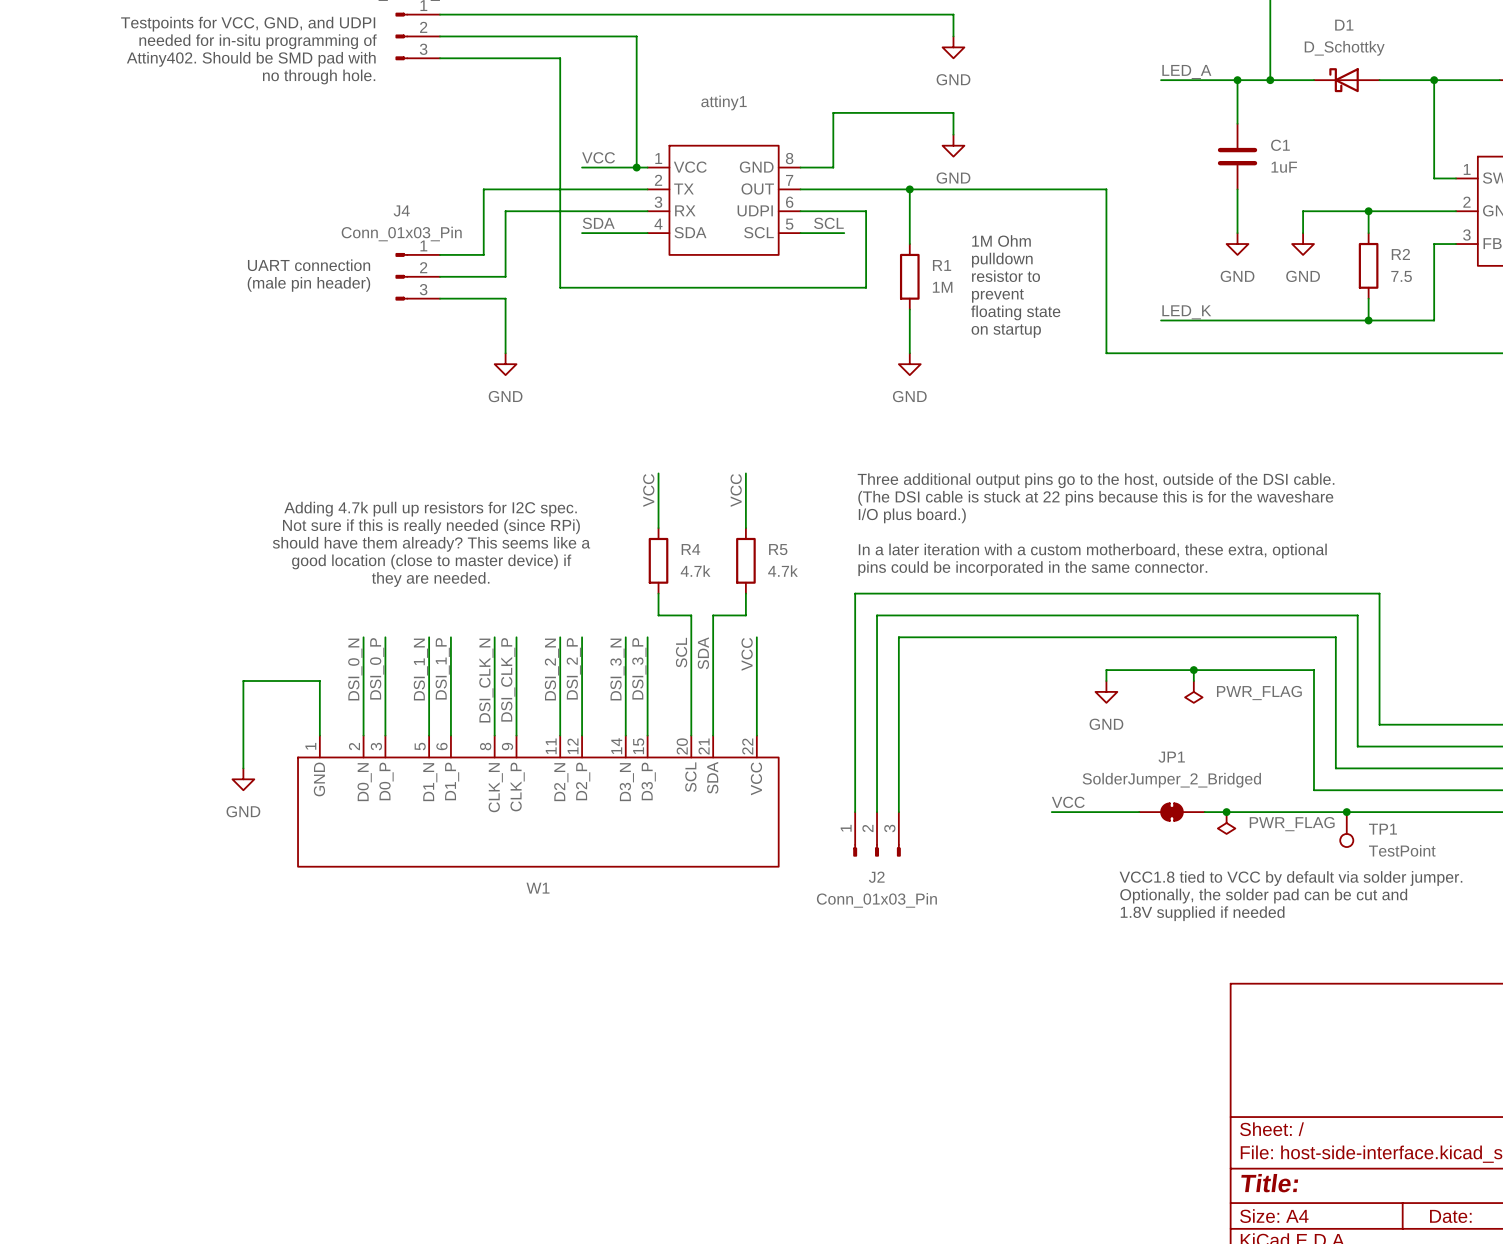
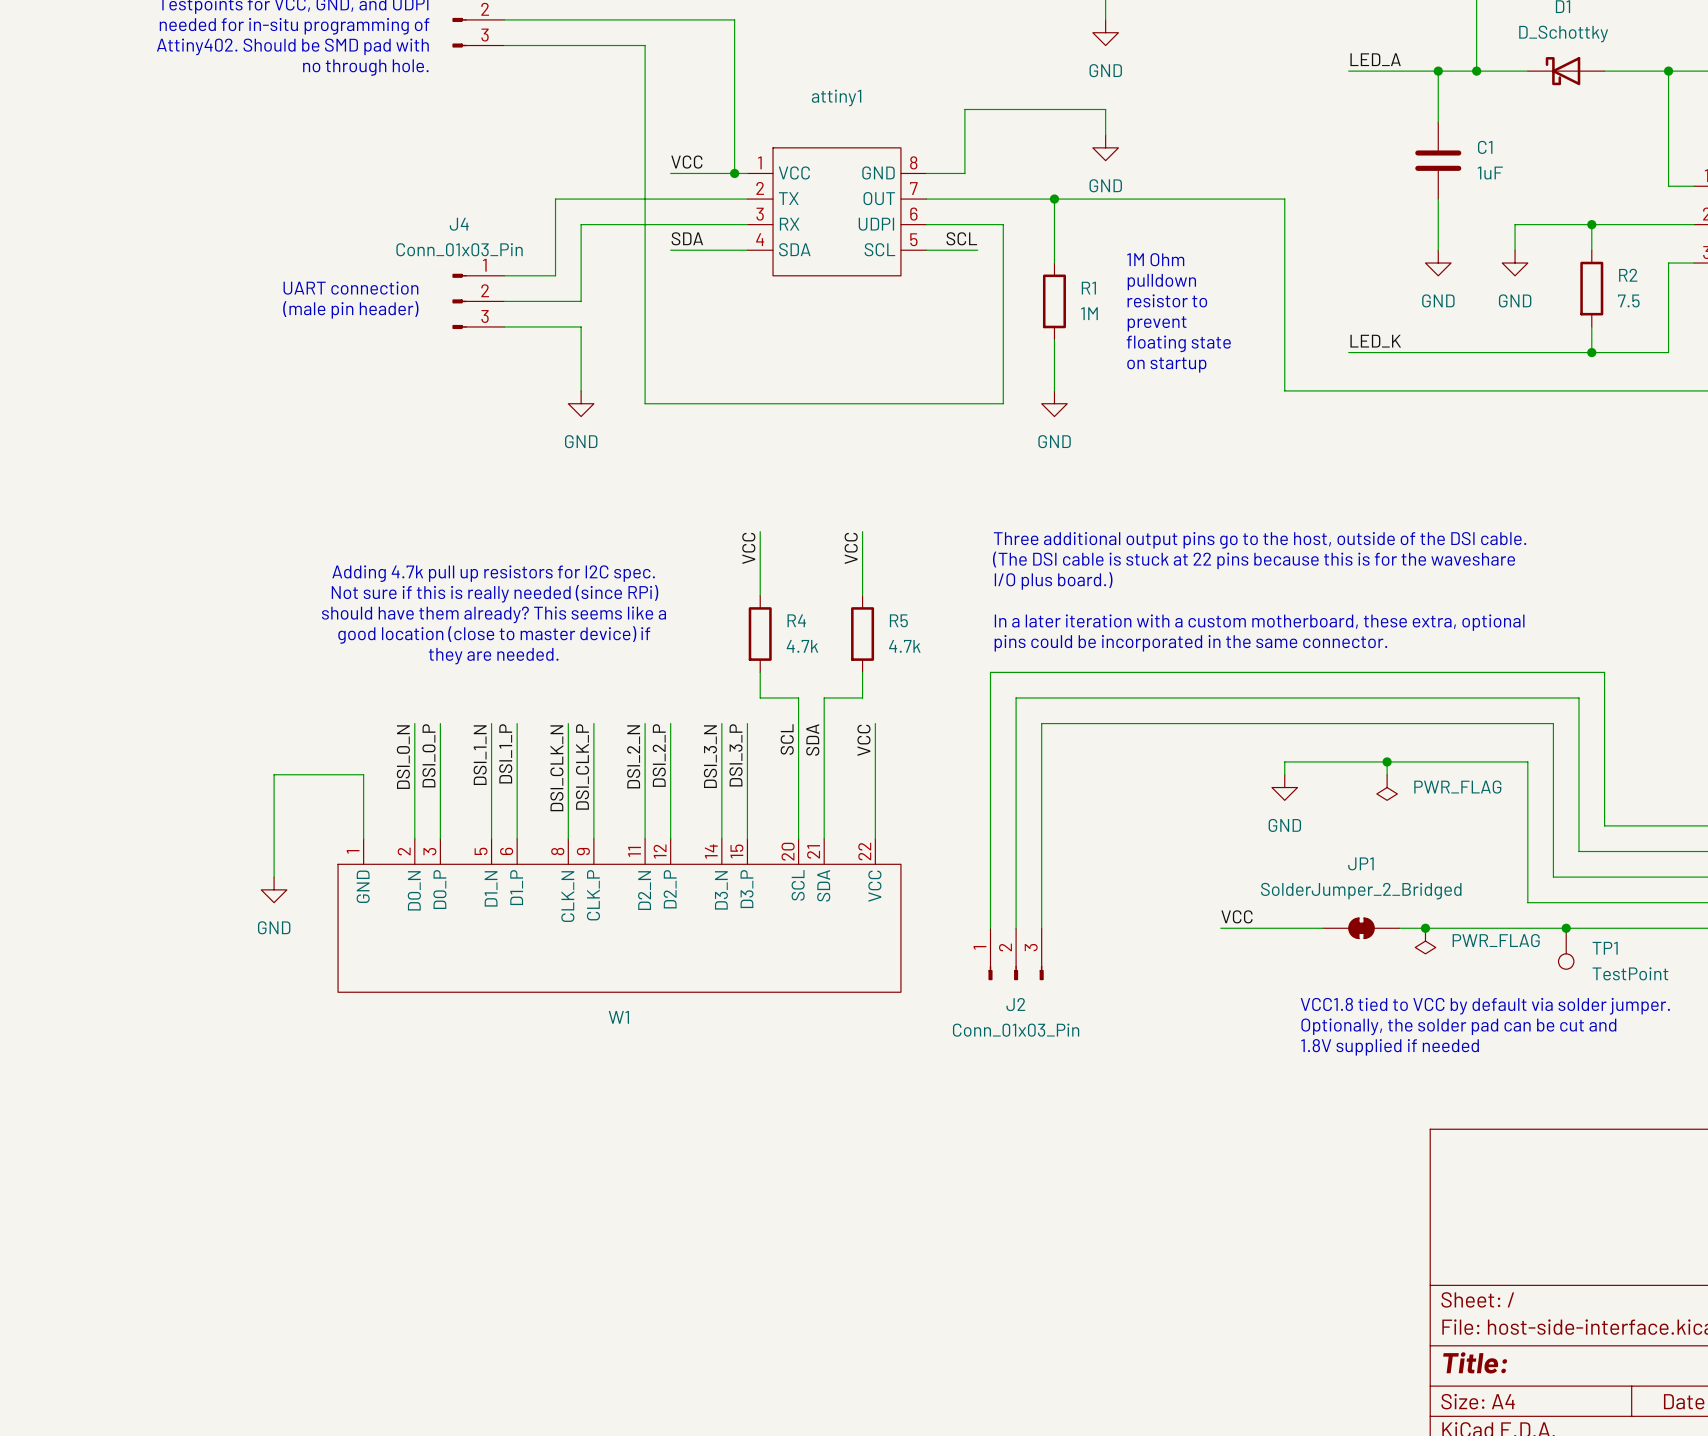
wire: (560, 287) (866, 287) -> (645, 314) (645, 403) (1003, 403) (1003, 314)

